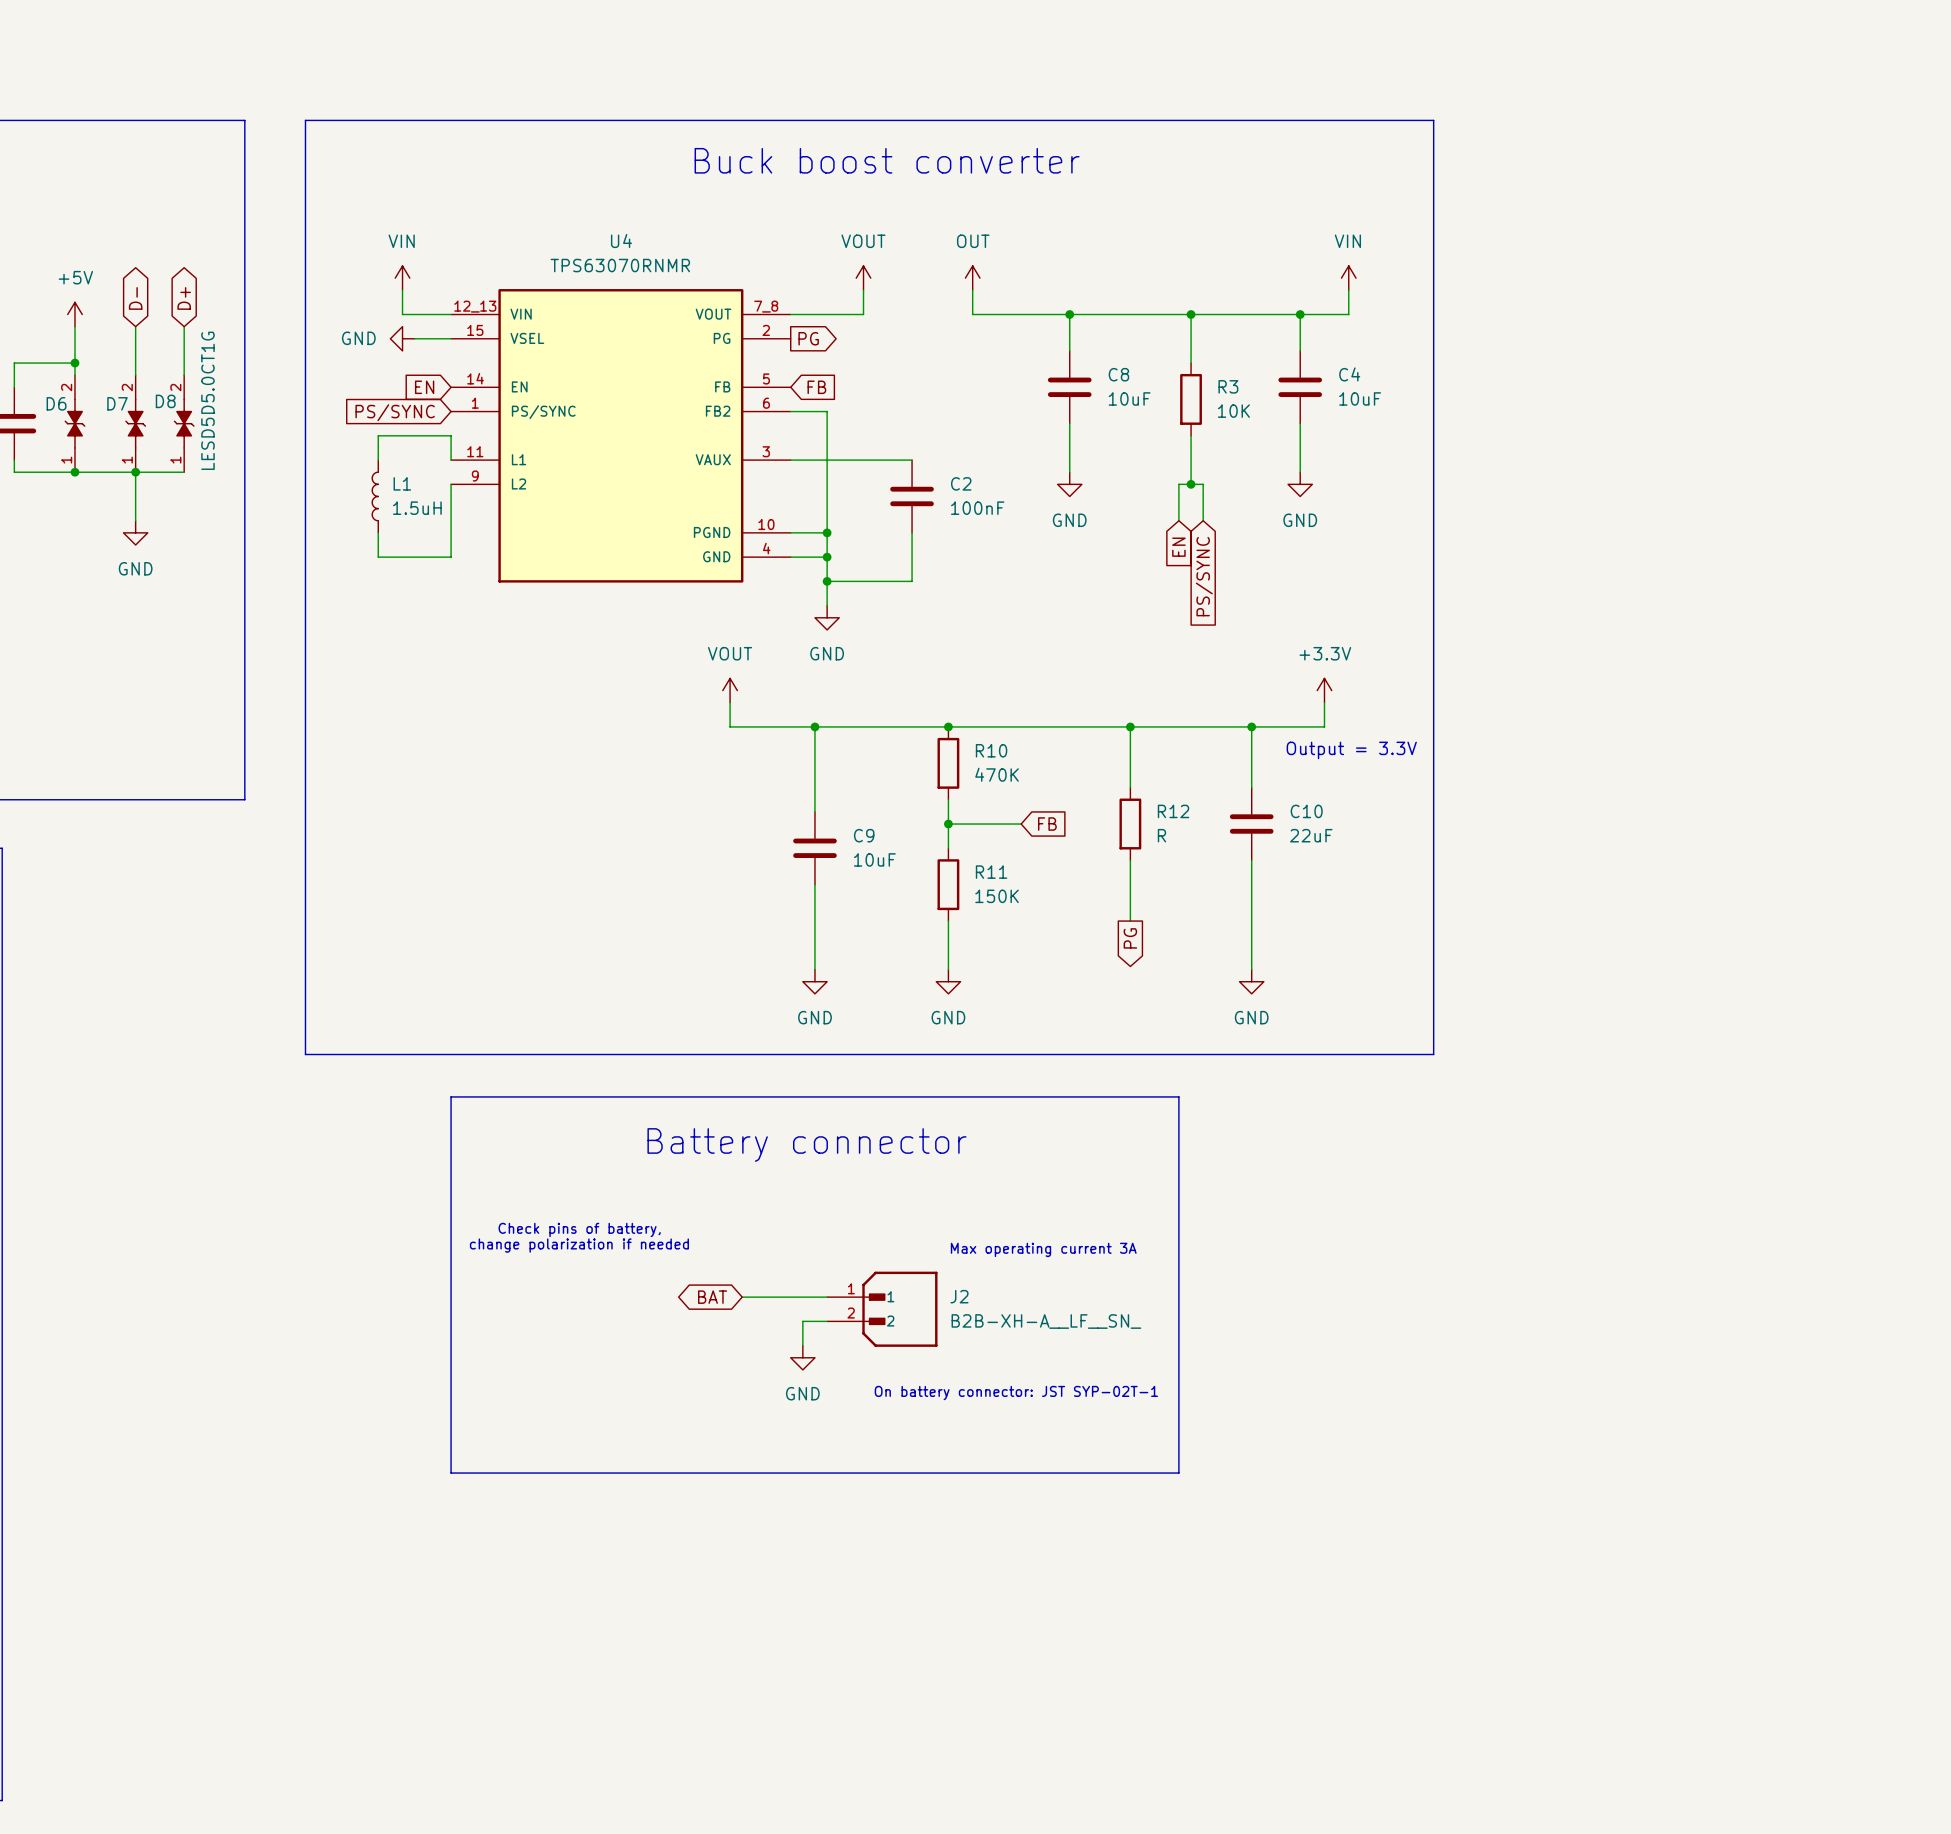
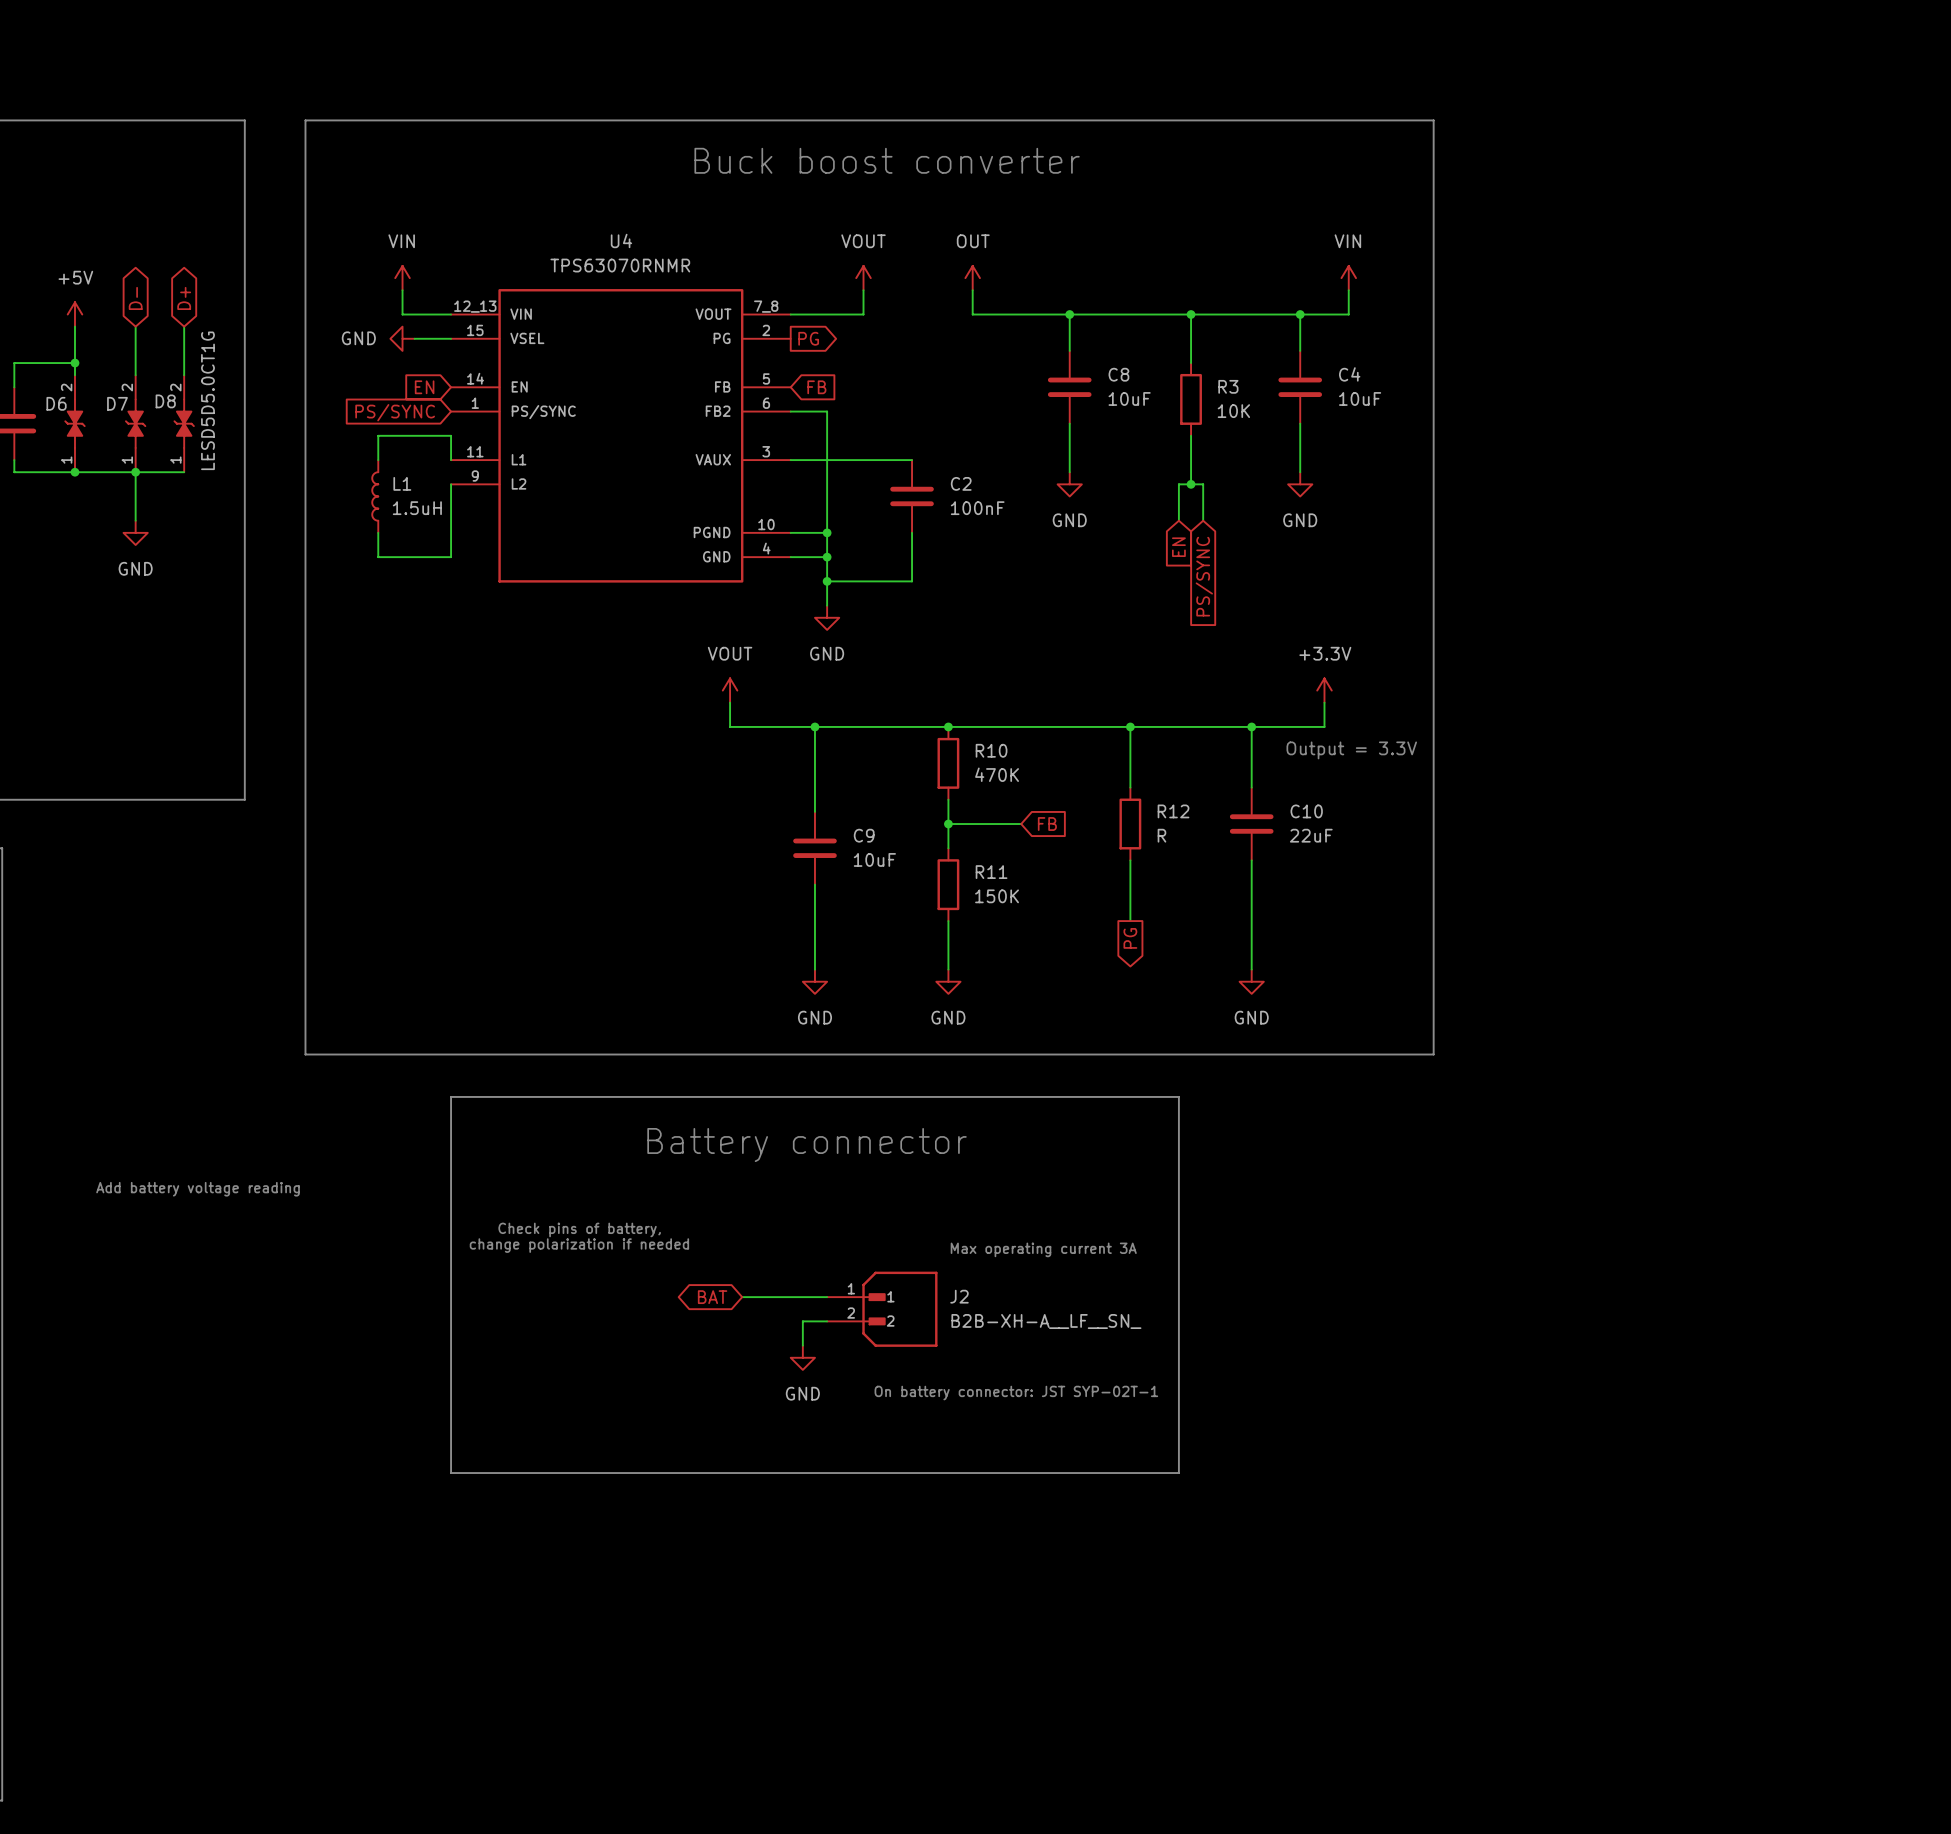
text: none -> Add battery voltage reading (198, 1189)

